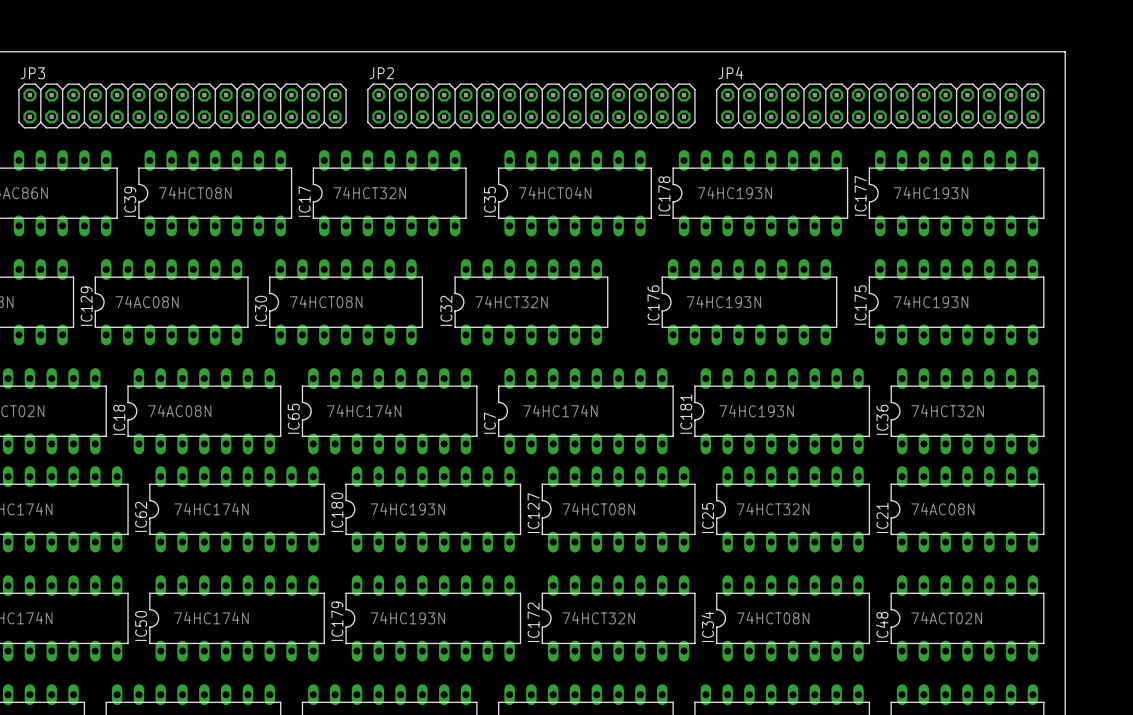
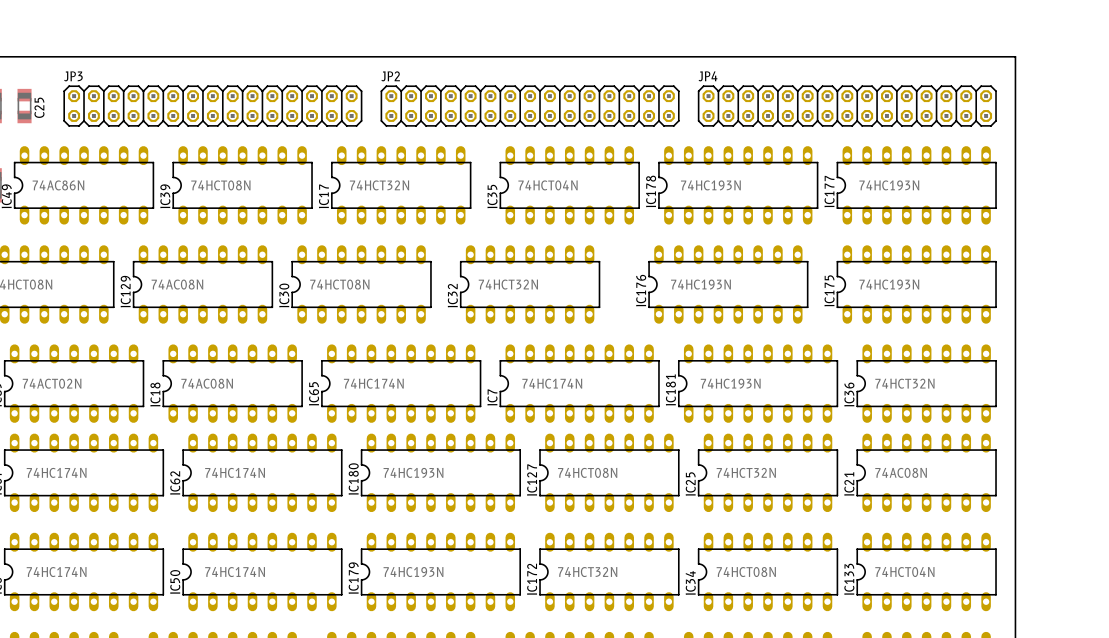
IC48 value: 74ACT02N (946, 618) -> 74HCT04N (904, 572)
IC48 name: IC48 (882, 627) -> IC133 (849, 579)

